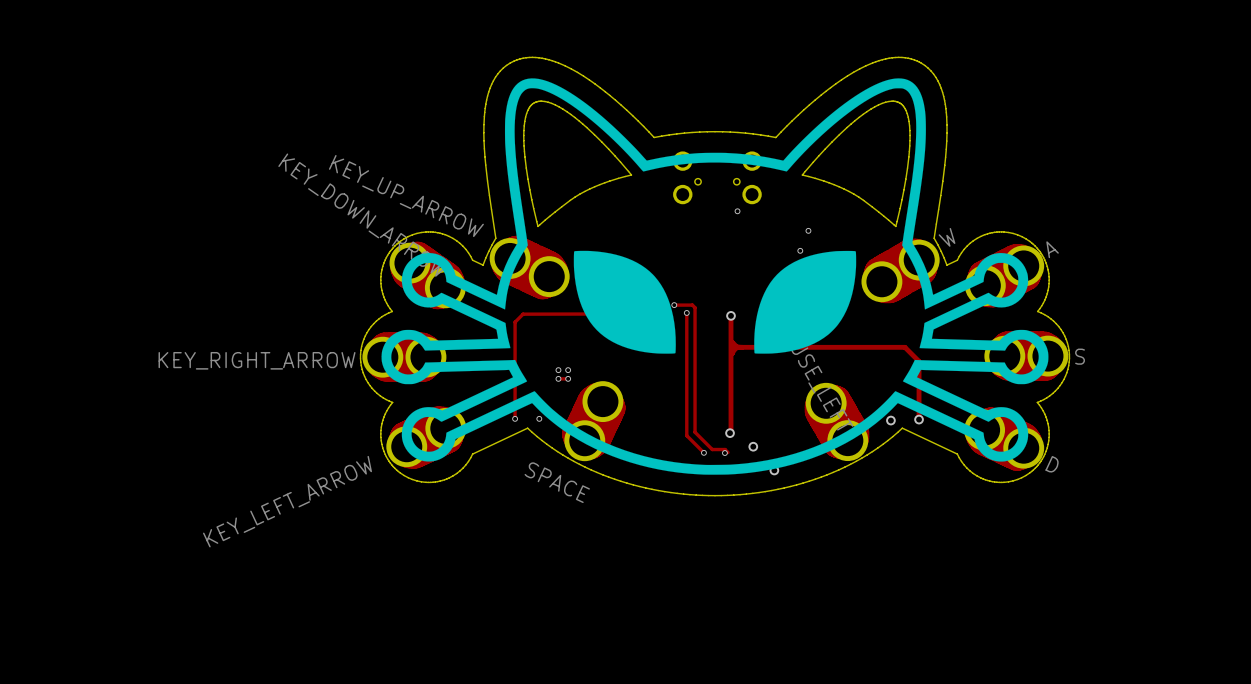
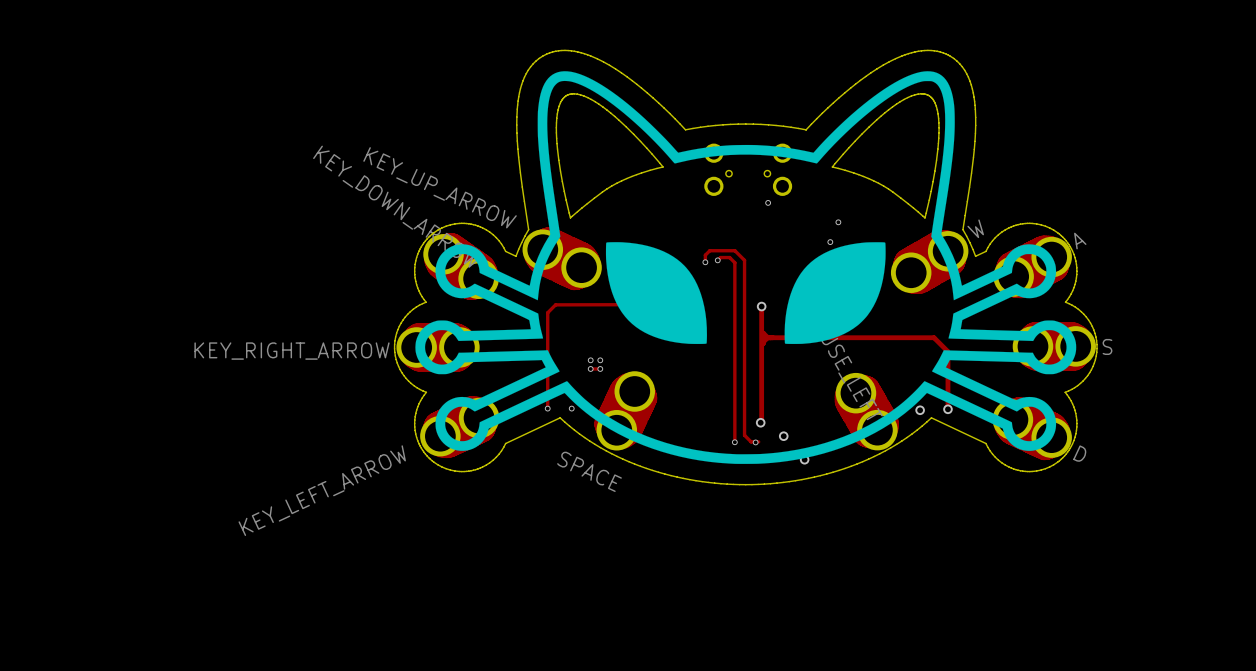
via: none -> (717, 260)
via: none -> (705, 262)
track: (674, 305) (692, 305) (695, 307) (695, 432) (712, 449) (725, 449) (727, 452) -> (705, 262) (705, 255) (709, 250) (734, 250) (744, 260) (744, 435) (751, 441) (758, 441)
via: (674, 305) -> none
track: (686, 312) (686, 435) (703, 452) -> (717, 260) (720, 257) (729, 257) (734, 262) (734, 442)
via: (686, 312) -> none

